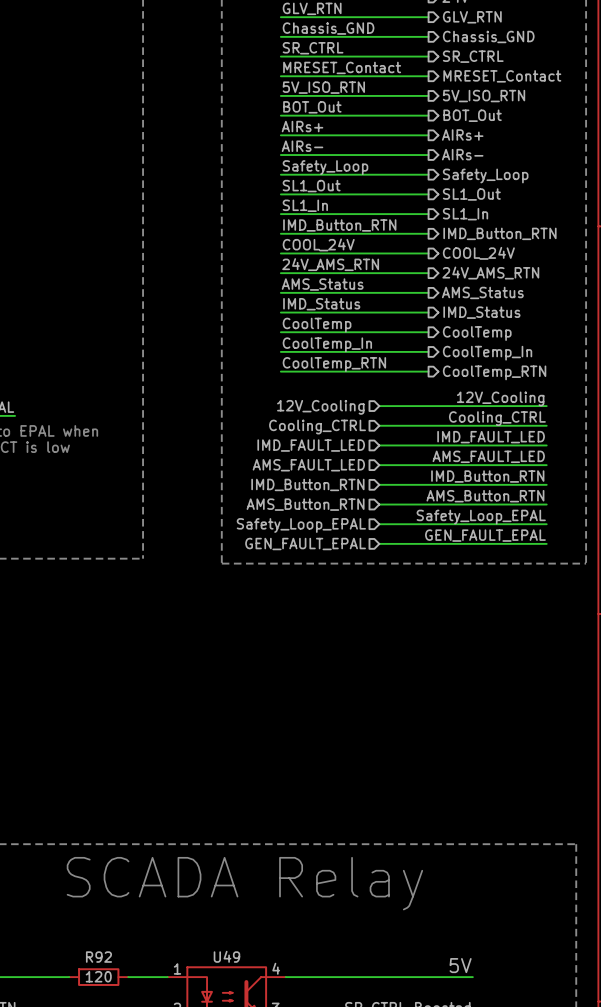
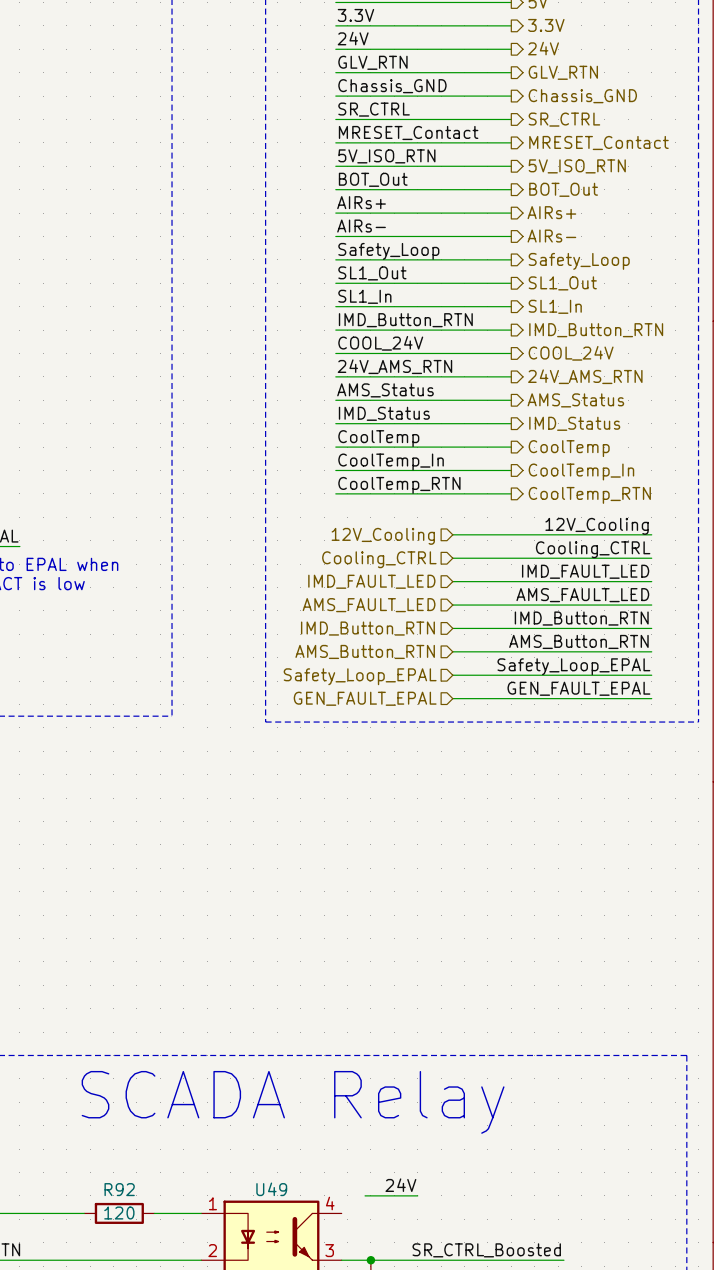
label: none -> 24V (400, 1185)
wire: none -> (365, 1195) (417, 1195)
label: 5V (460, 965) -> none
wire: (285, 977) (472, 977) -> none

